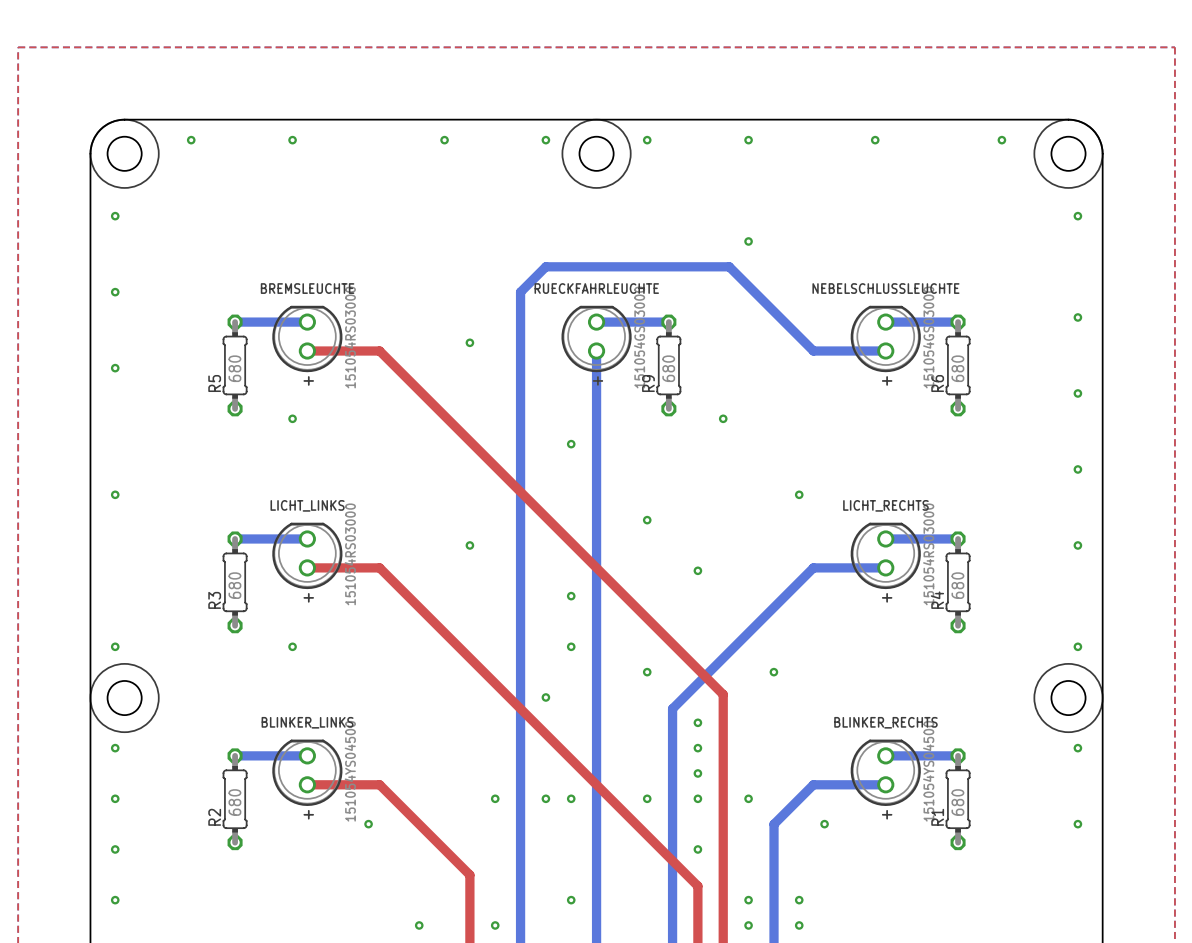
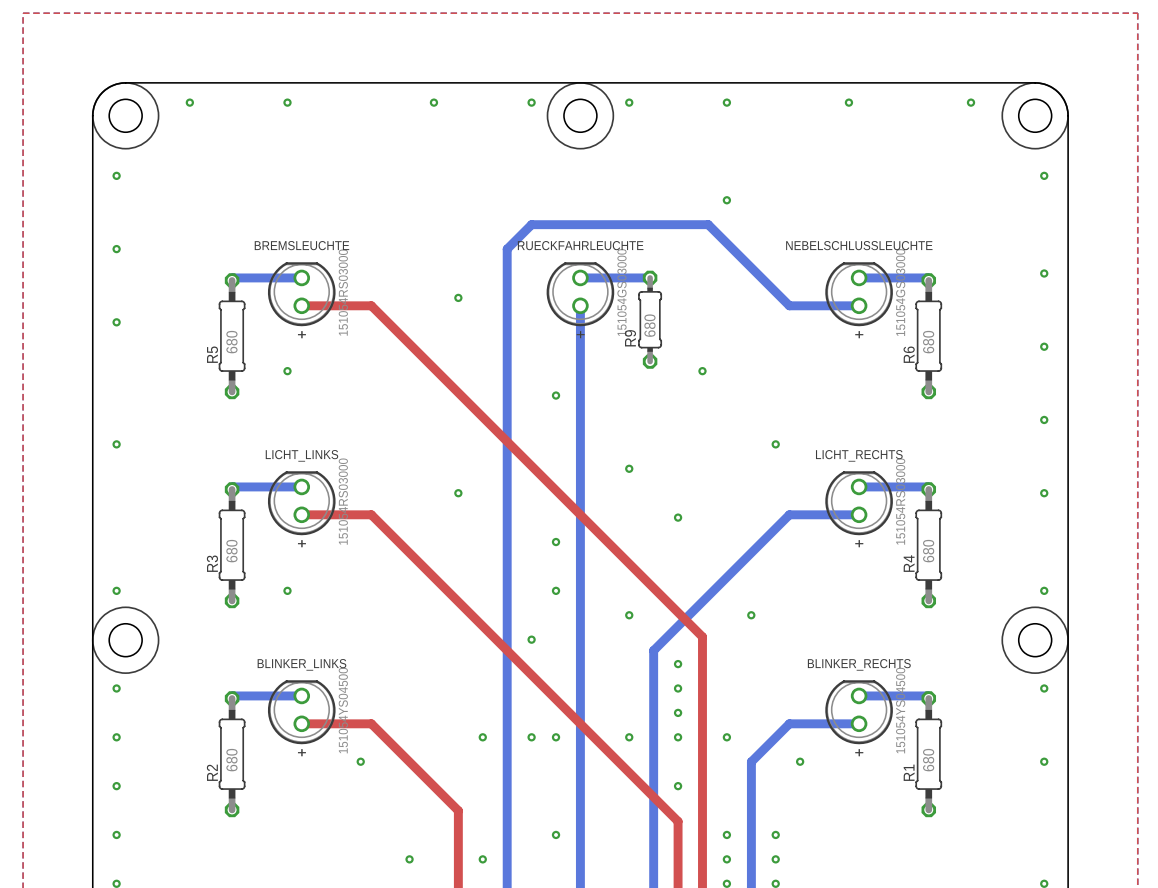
R5 footprint: [222, 314, 248, 417] -> [218, 273, 246, 400]
R6 footprint: [945, 314, 971, 417] -> [915, 273, 943, 400]
R3 footprint: [222, 531, 248, 634] -> [218, 482, 246, 609]
R4 footprint: [945, 531, 971, 634] -> [915, 482, 943, 609]
R2 footprint: [222, 748, 248, 851] -> [218, 691, 246, 818]
R1 footprint: [945, 748, 971, 851] -> [915, 691, 943, 818]

